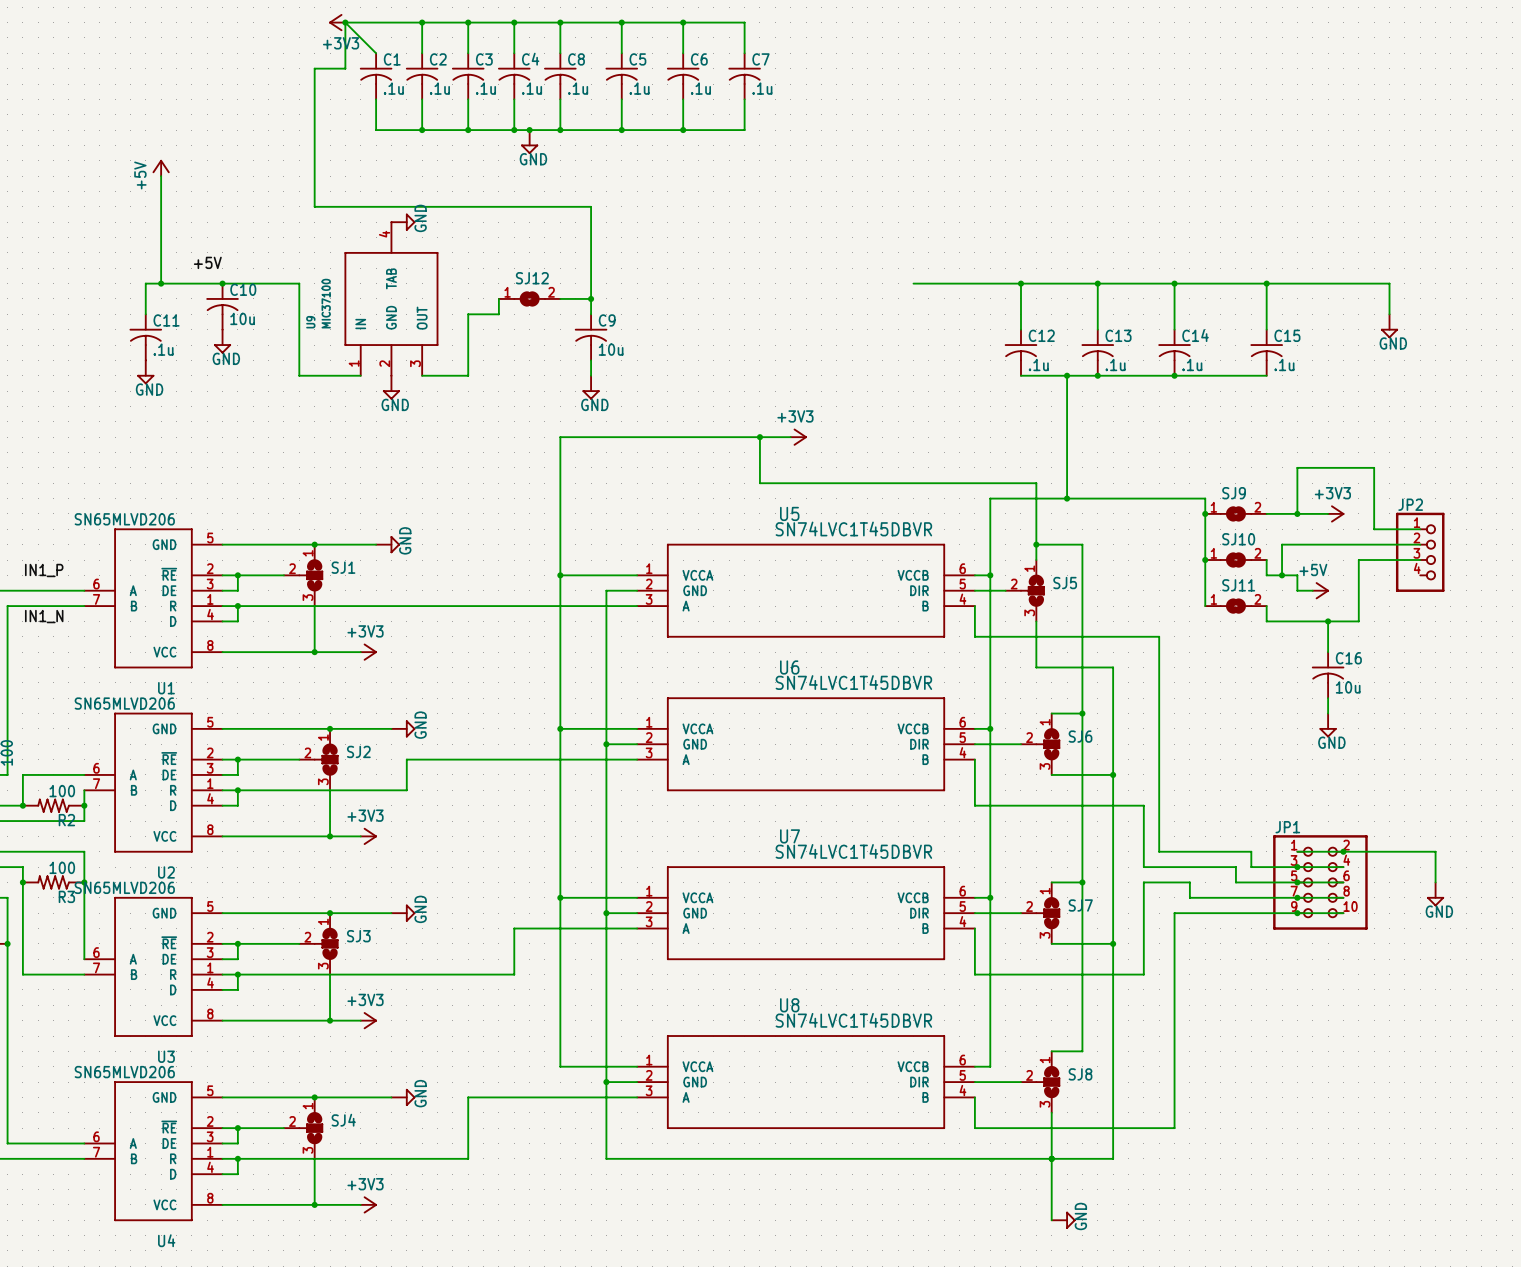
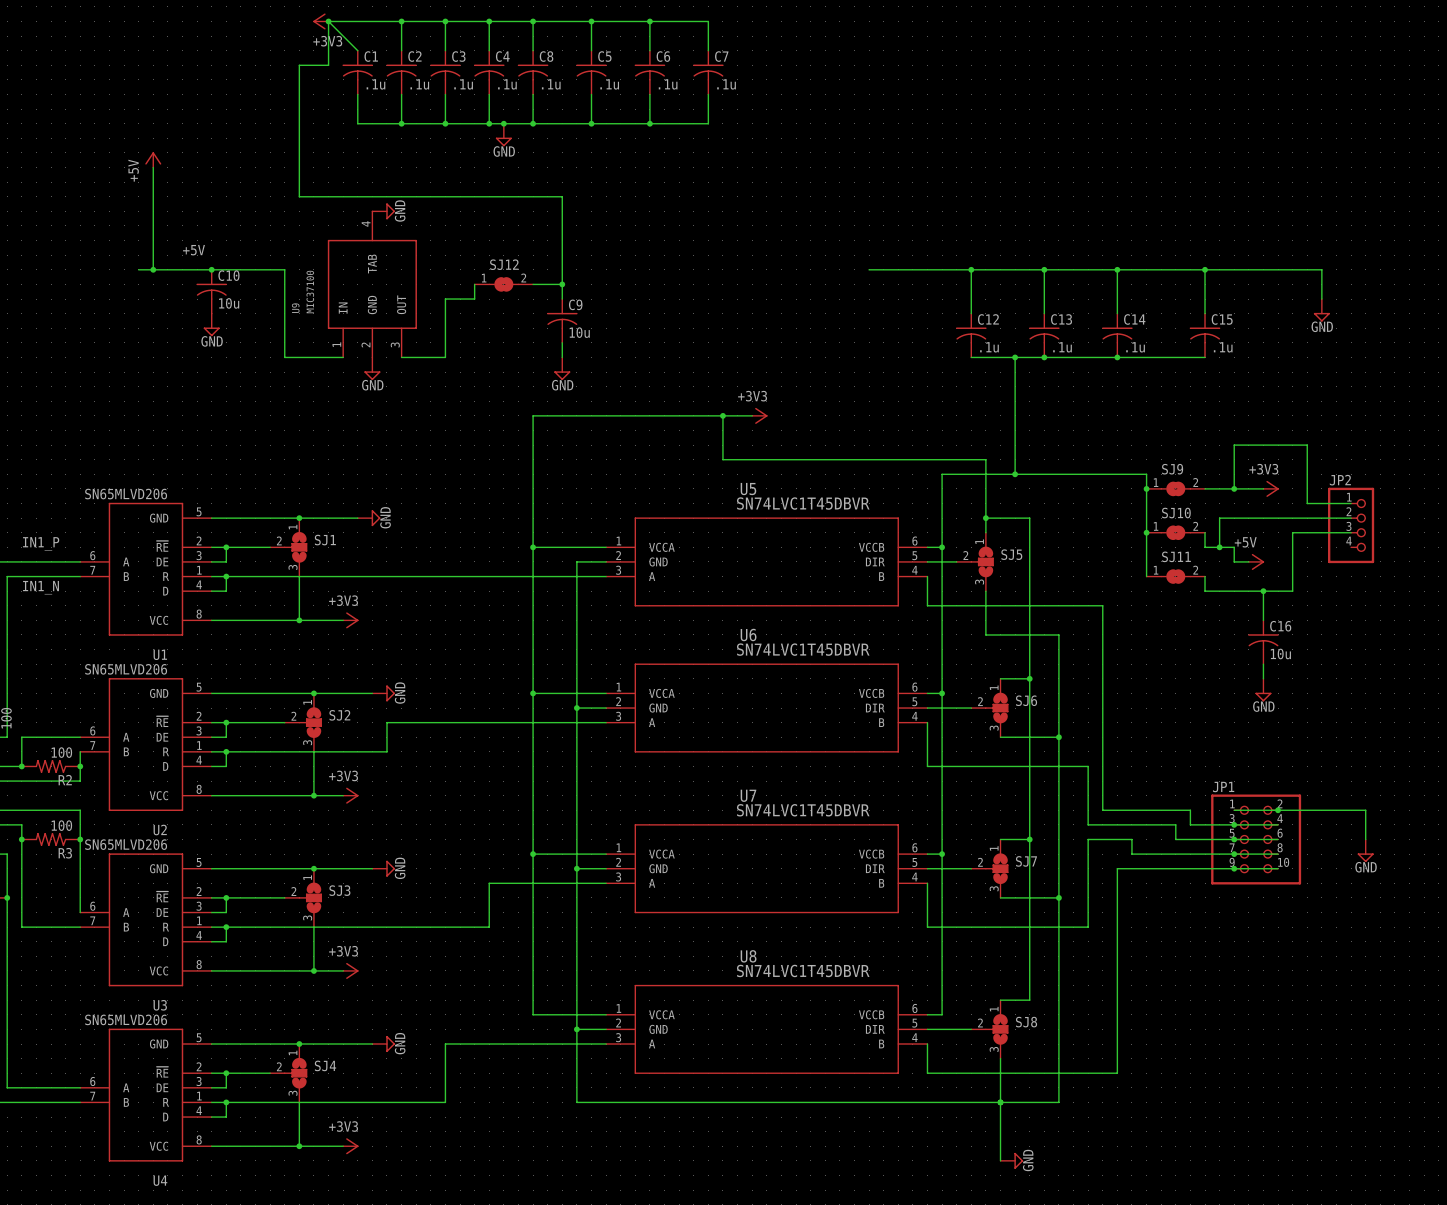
wire: (145, 283) (145, 314) -> none
C11: .1u (145, 337) -> none
power symbol: GND (145, 372) -> none

